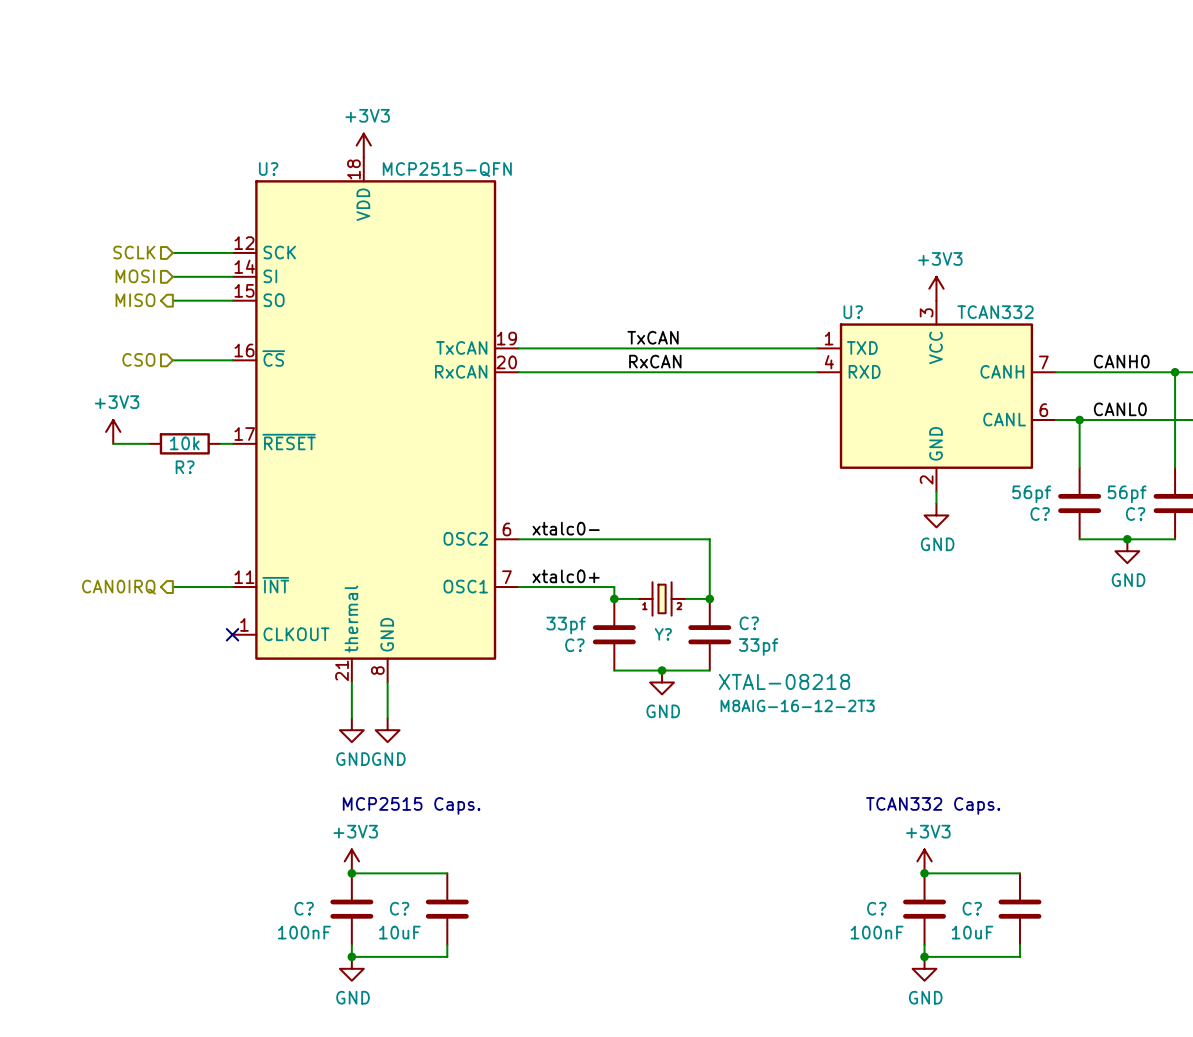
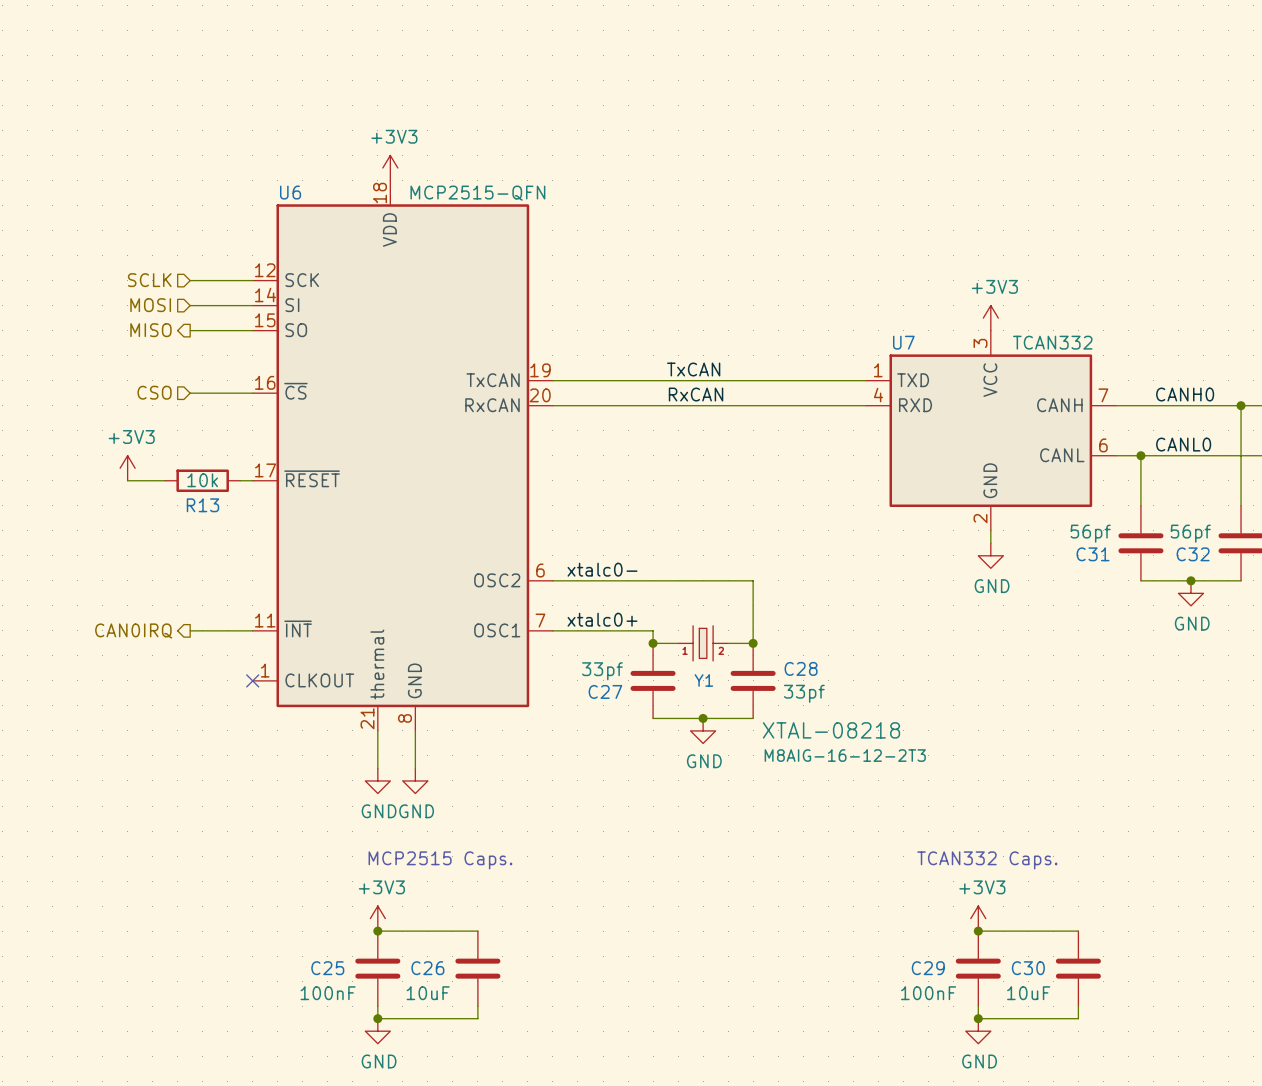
U? name: U? (268, 169) -> U6 (290, 192)
U? name: U? (853, 312) -> U7 (903, 342)
R? name: R? (185, 467) -> R13 (202, 505)
C? name: C? (1040, 514) -> C31 (1093, 554)
C? name: C? (1135, 514) -> C32 (1193, 554)
C? name: C? (749, 623) -> C28 (801, 668)
Y? name: Y? (663, 634) -> Y1 (703, 680)
C? name: C? (574, 645) -> C27 (605, 691)
C? name: C? (304, 908) -> C25 (327, 968)
C? name: C? (399, 908) -> C26 (427, 968)
C? name: C? (876, 908) -> C29 (928, 968)
C? name: C? (972, 908) -> C30 (1028, 968)

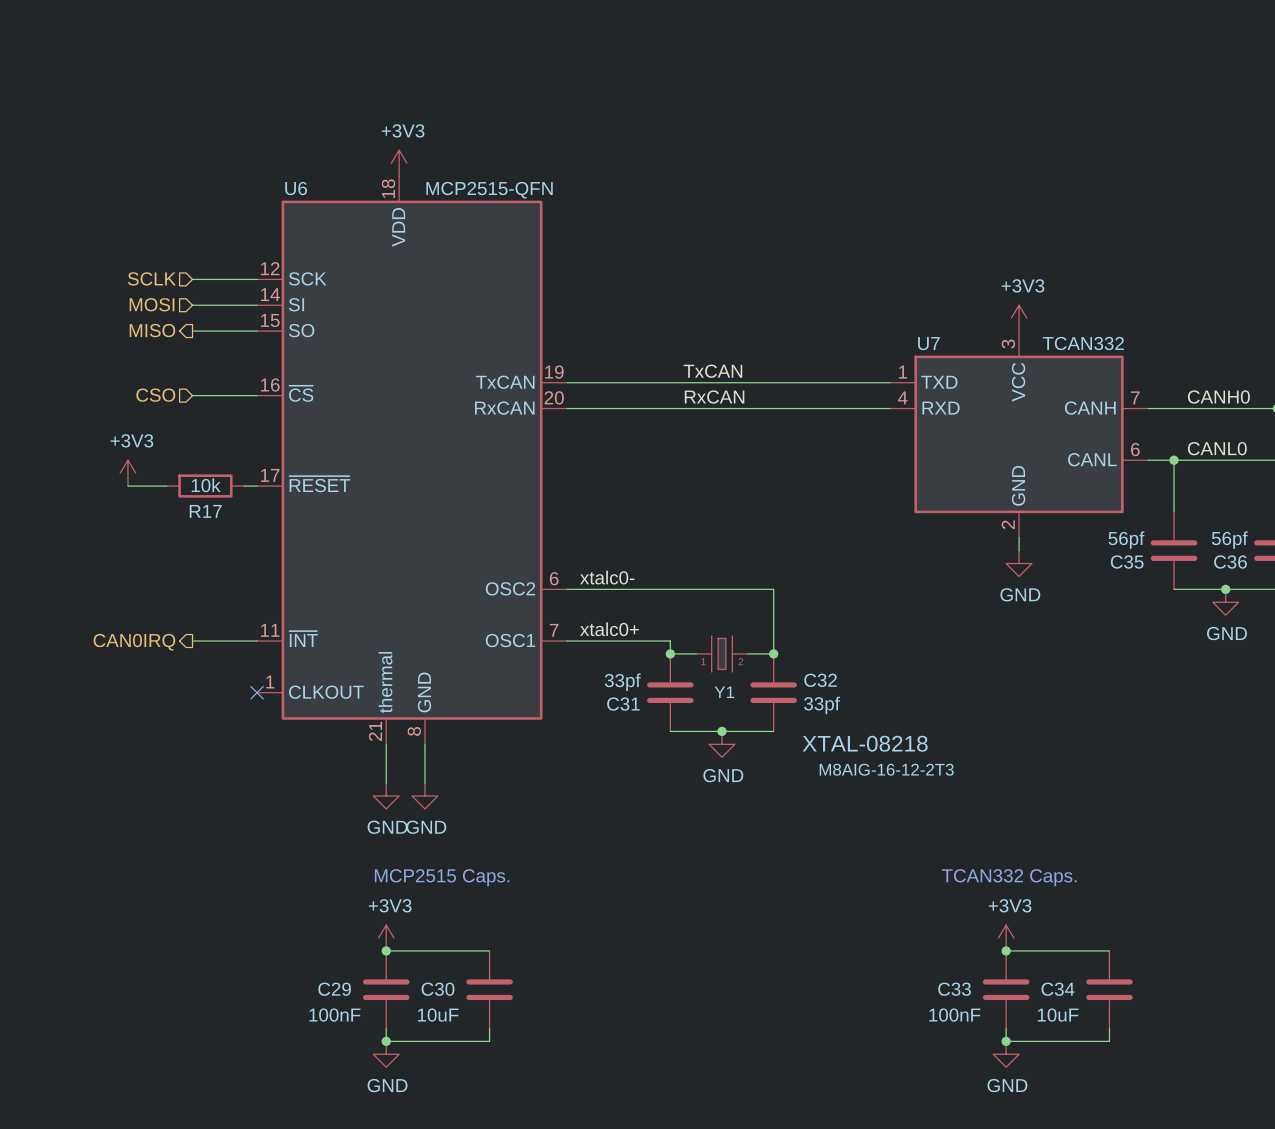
R13 name: R13 (202, 505) -> R17 (205, 511)
C31 name: C31 (1093, 554) -> C35 (1127, 562)
C32 name: C32 (1193, 554) -> C36 (1230, 562)
C28 name: C28 (801, 668) -> C32 (820, 680)
C27 name: C27 (605, 691) -> C31 (623, 704)
C25 name: C25 (327, 968) -> C29 (334, 989)
C26 name: C26 (427, 968) -> C30 (438, 989)
C29 name: C29 (928, 968) -> C33 (954, 989)
C30 name: C30 (1028, 968) -> C34 (1058, 989)

